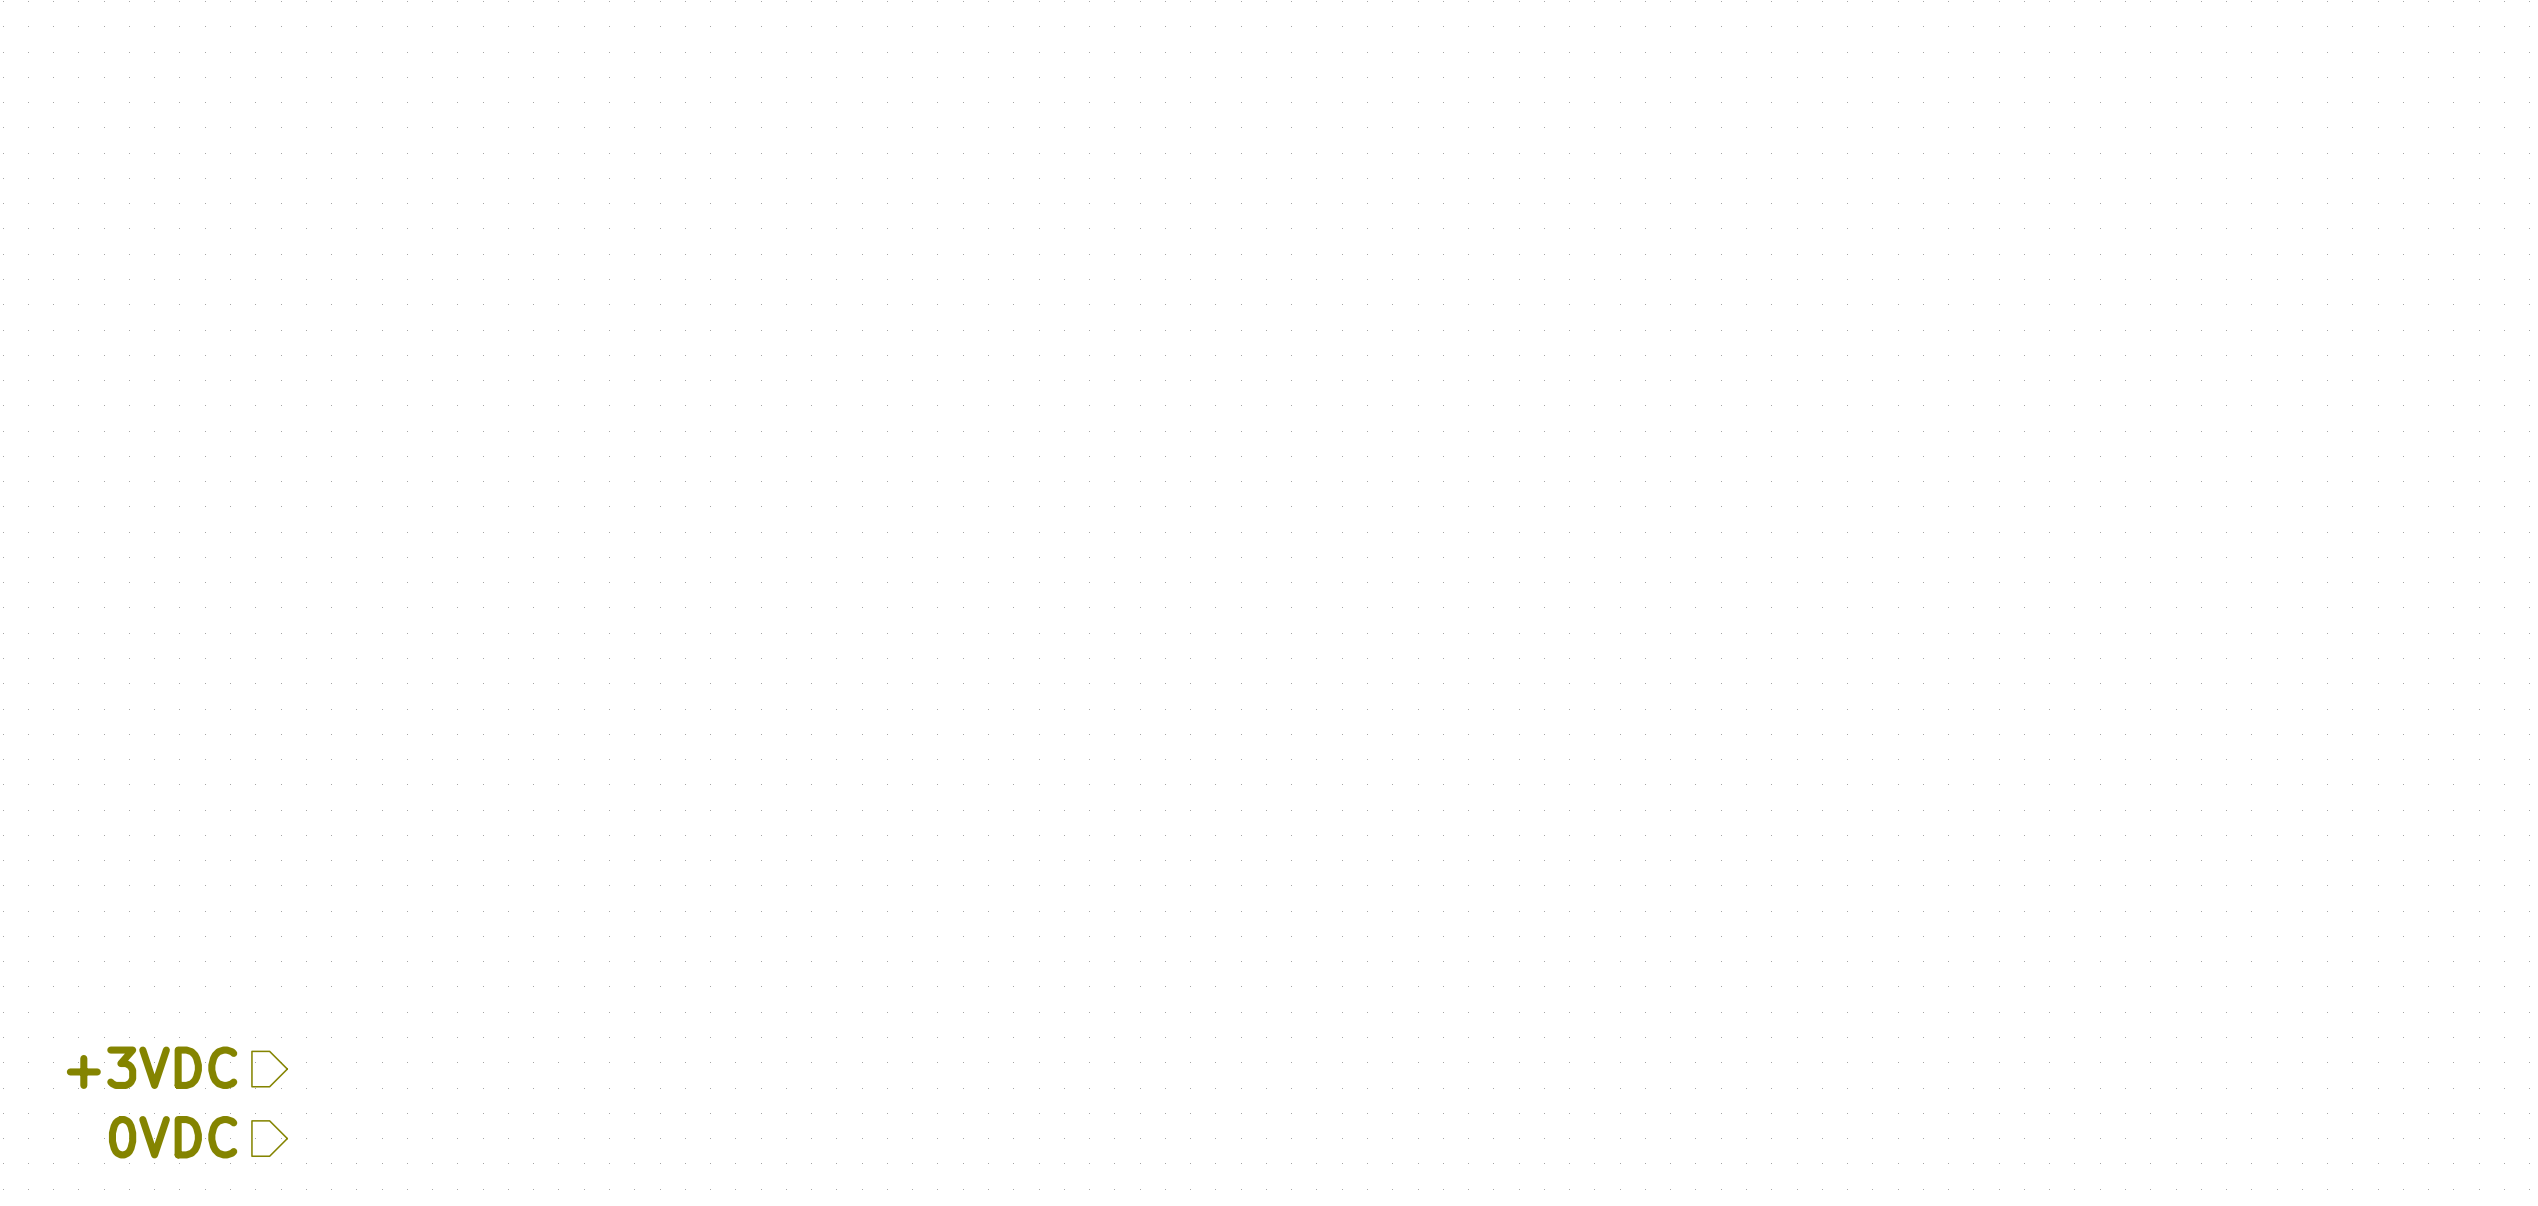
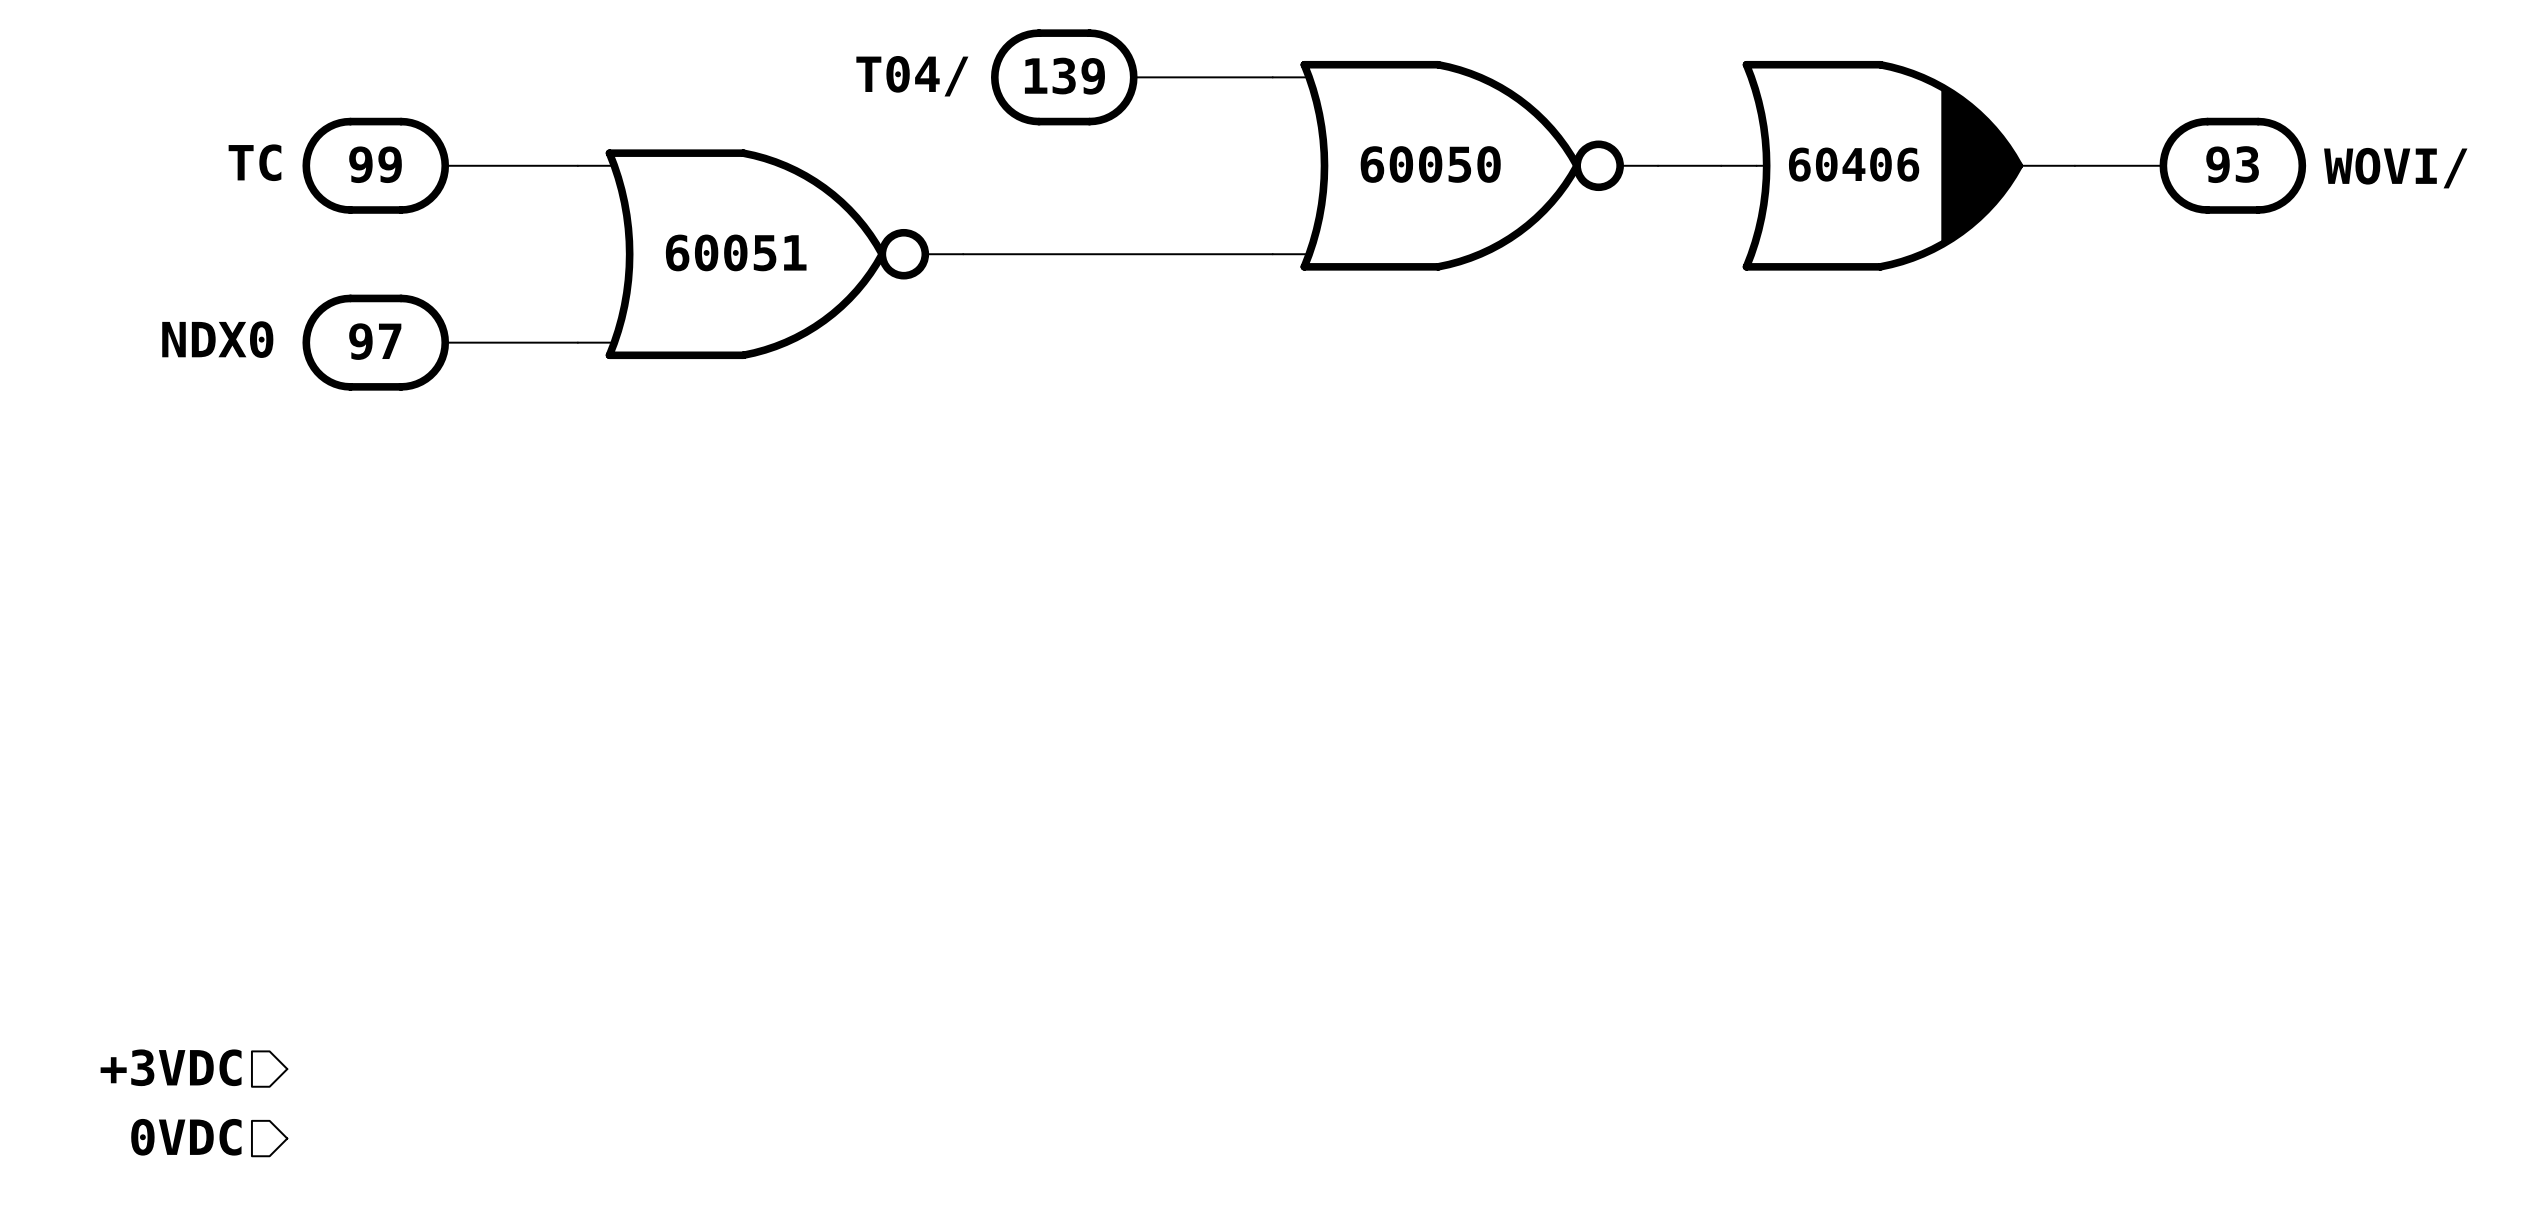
part: none -> (1064, 77)
wire: none -> (1133, 77) (1272, 77)
part: none -> (375, 165)
wire: none -> (445, 165) (577, 165)
part: none -> (1465, 165)
wire: none -> (1658, 165) (1721, 165)
part: none -> (1898, 165)
wire: none -> (2074, 165) (2163, 165)
part: none -> (2232, 165)
part: none -> (770, 254)
wire: none -> (963, 254) (1272, 254)
part: none -> (375, 342)
wire: none -> (445, 342) (577, 342)

